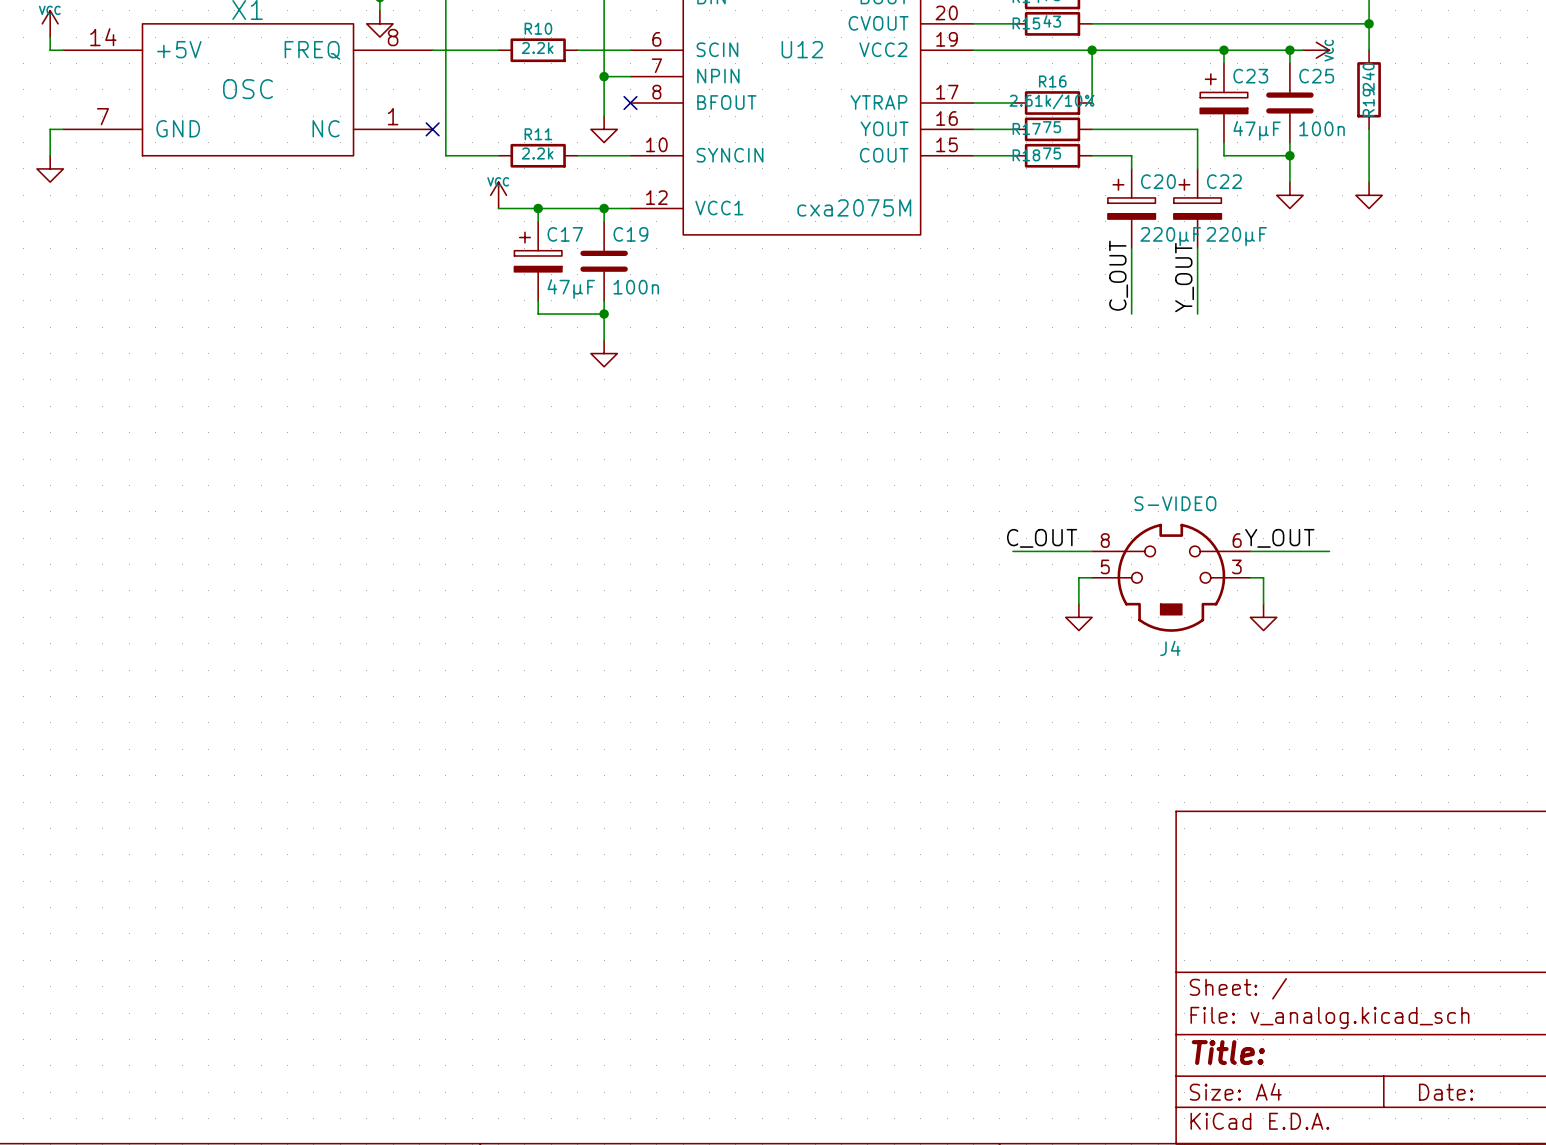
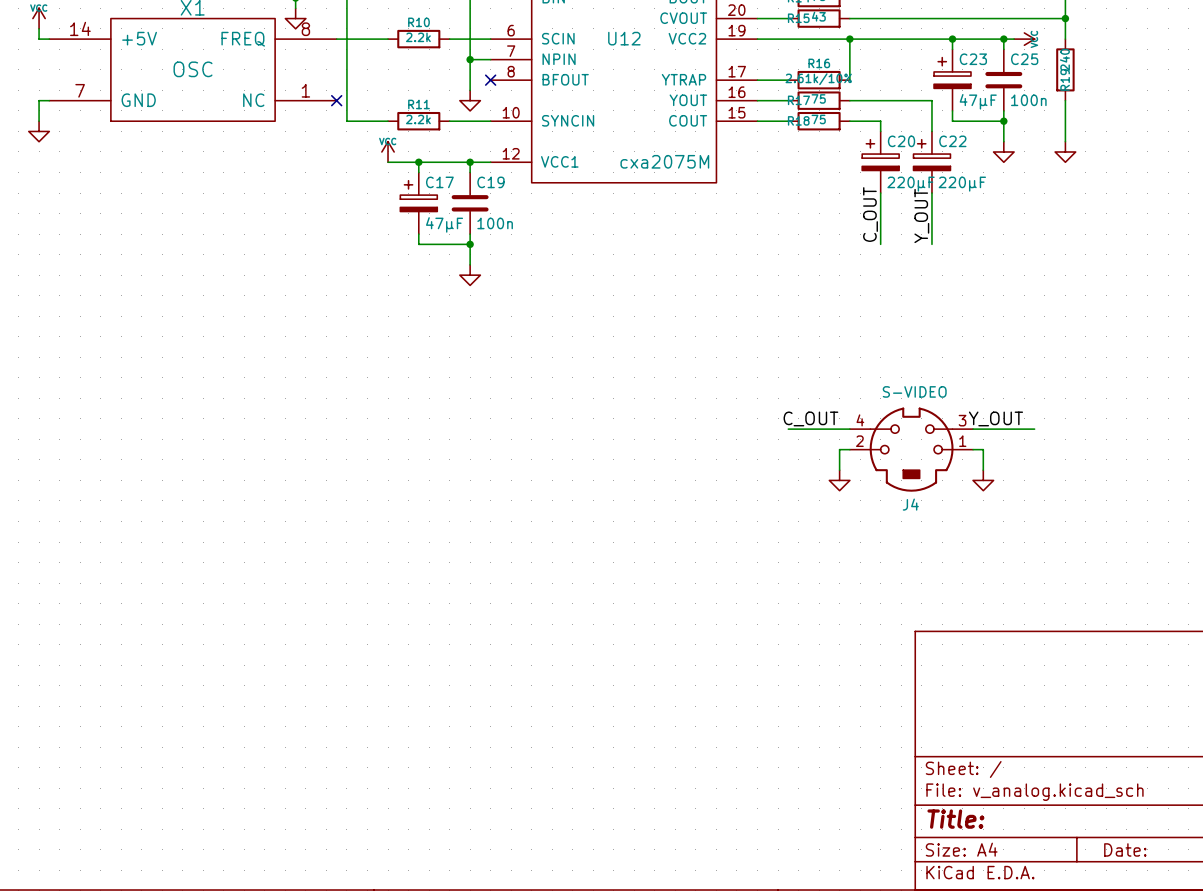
J4 pin number: 8 (1105, 540) -> 4 (860, 420)
J4 pin number: 6 (1237, 540) -> 3 (962, 420)
J4 pin number: 5 (1105, 566) -> 2 (859, 441)
J4 pin number: 3 (1236, 566) -> 1 (962, 441)

